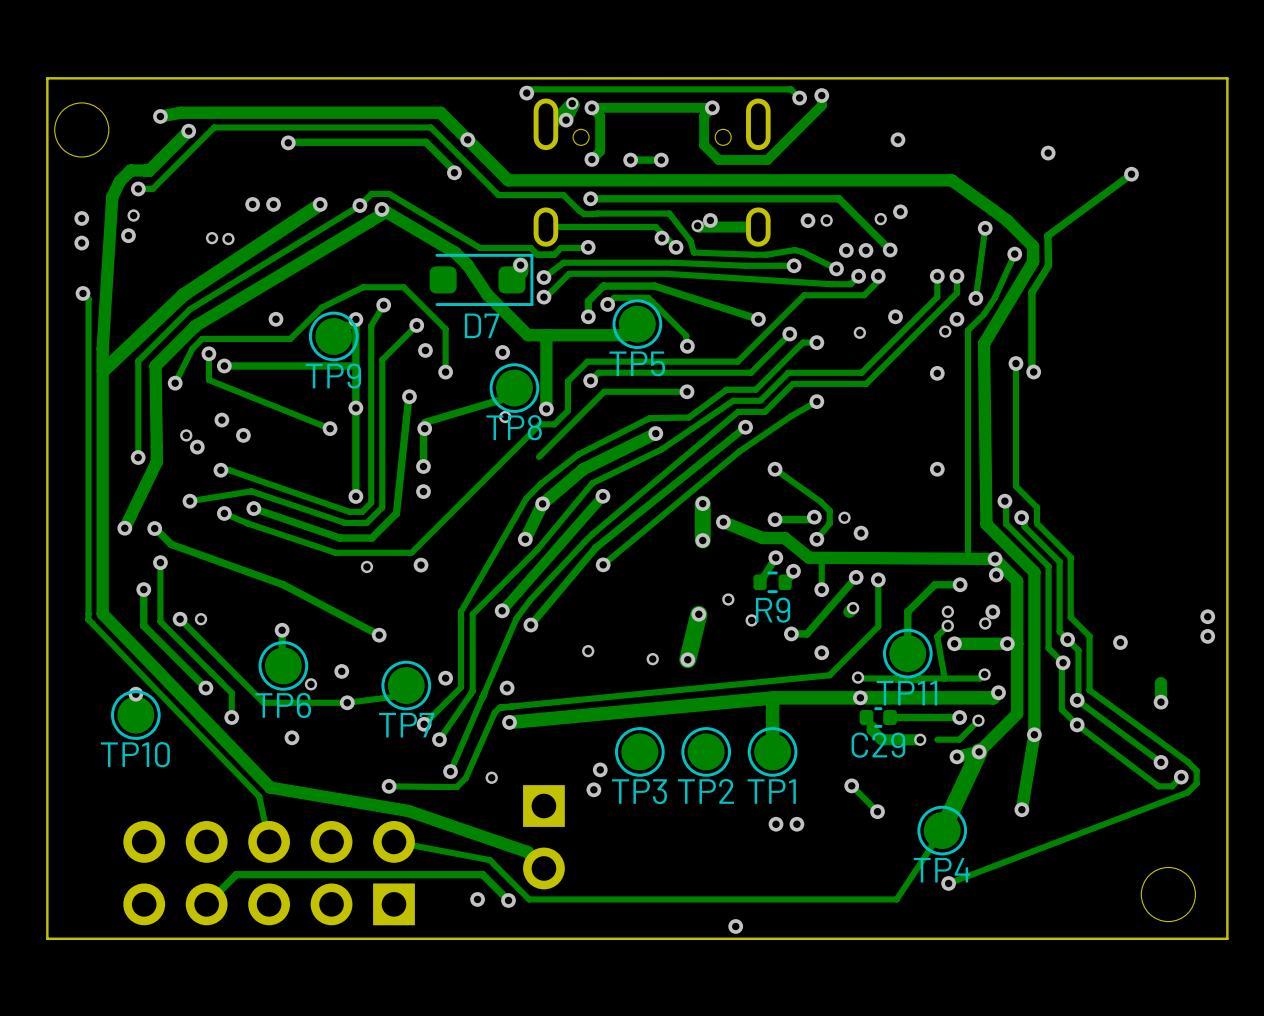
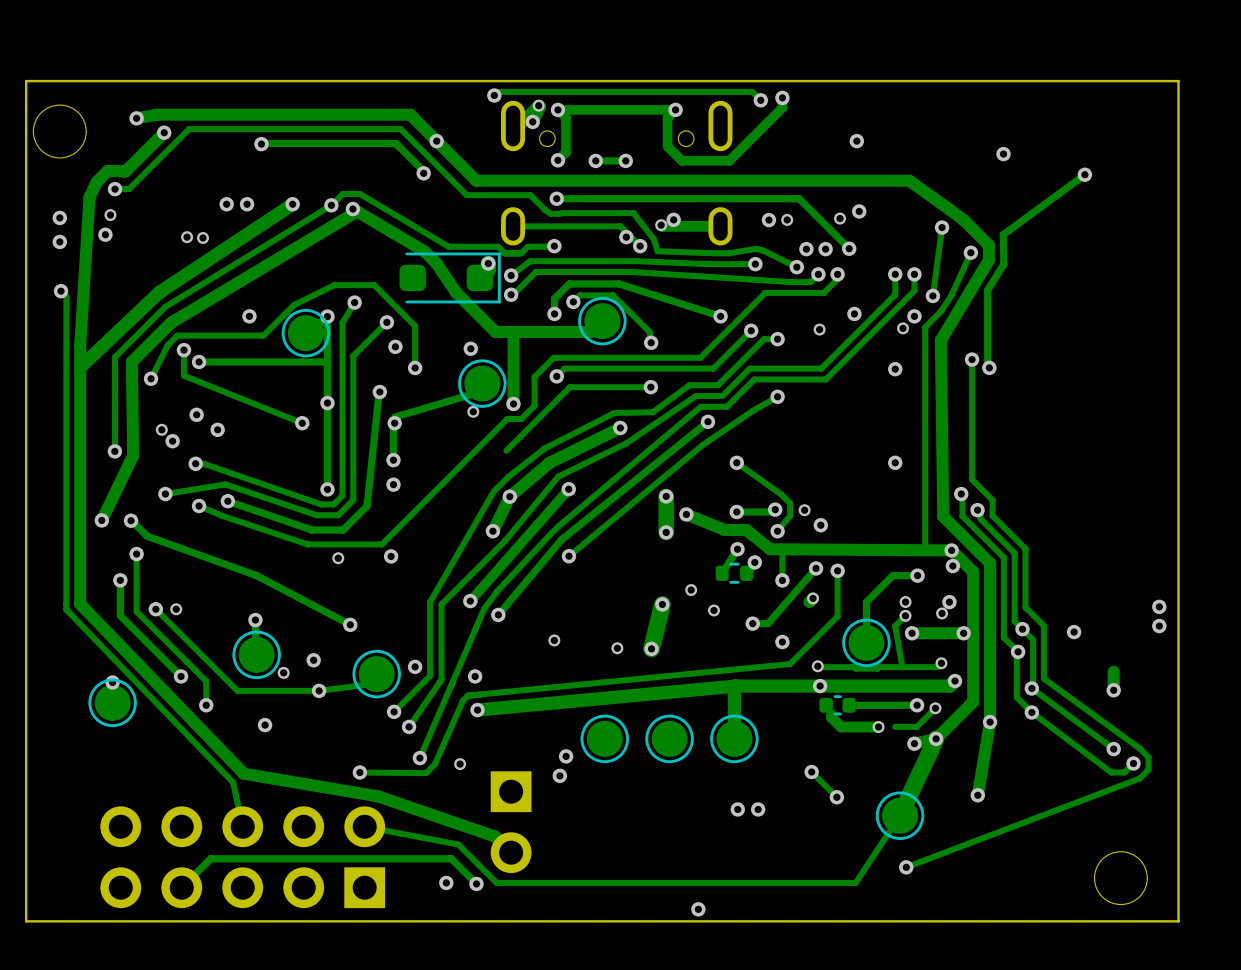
D7 name: D7 (481, 325) -> none
TP5 name: TP5 (637, 363) -> none
TP9 name: TP9 (333, 376) -> none
TP8 name: TP8 (514, 427) -> none
R9 name: R9 (773, 610) -> none
TP11 name: TP11 (906, 693) -> none
TP6 name: TP6 (283, 705) -> none
TP7 name: TP7 (406, 725) -> none
C29 name: C29 (878, 745) -> none
TP10 name: TP10 (135, 754) -> none
TP3 name: TP3 (639, 791) -> none
TP2 name: TP2 (705, 791) -> none
TP1 name: TP1 (771, 791) -> none
TP4 name: TP4 (941, 870) -> none

